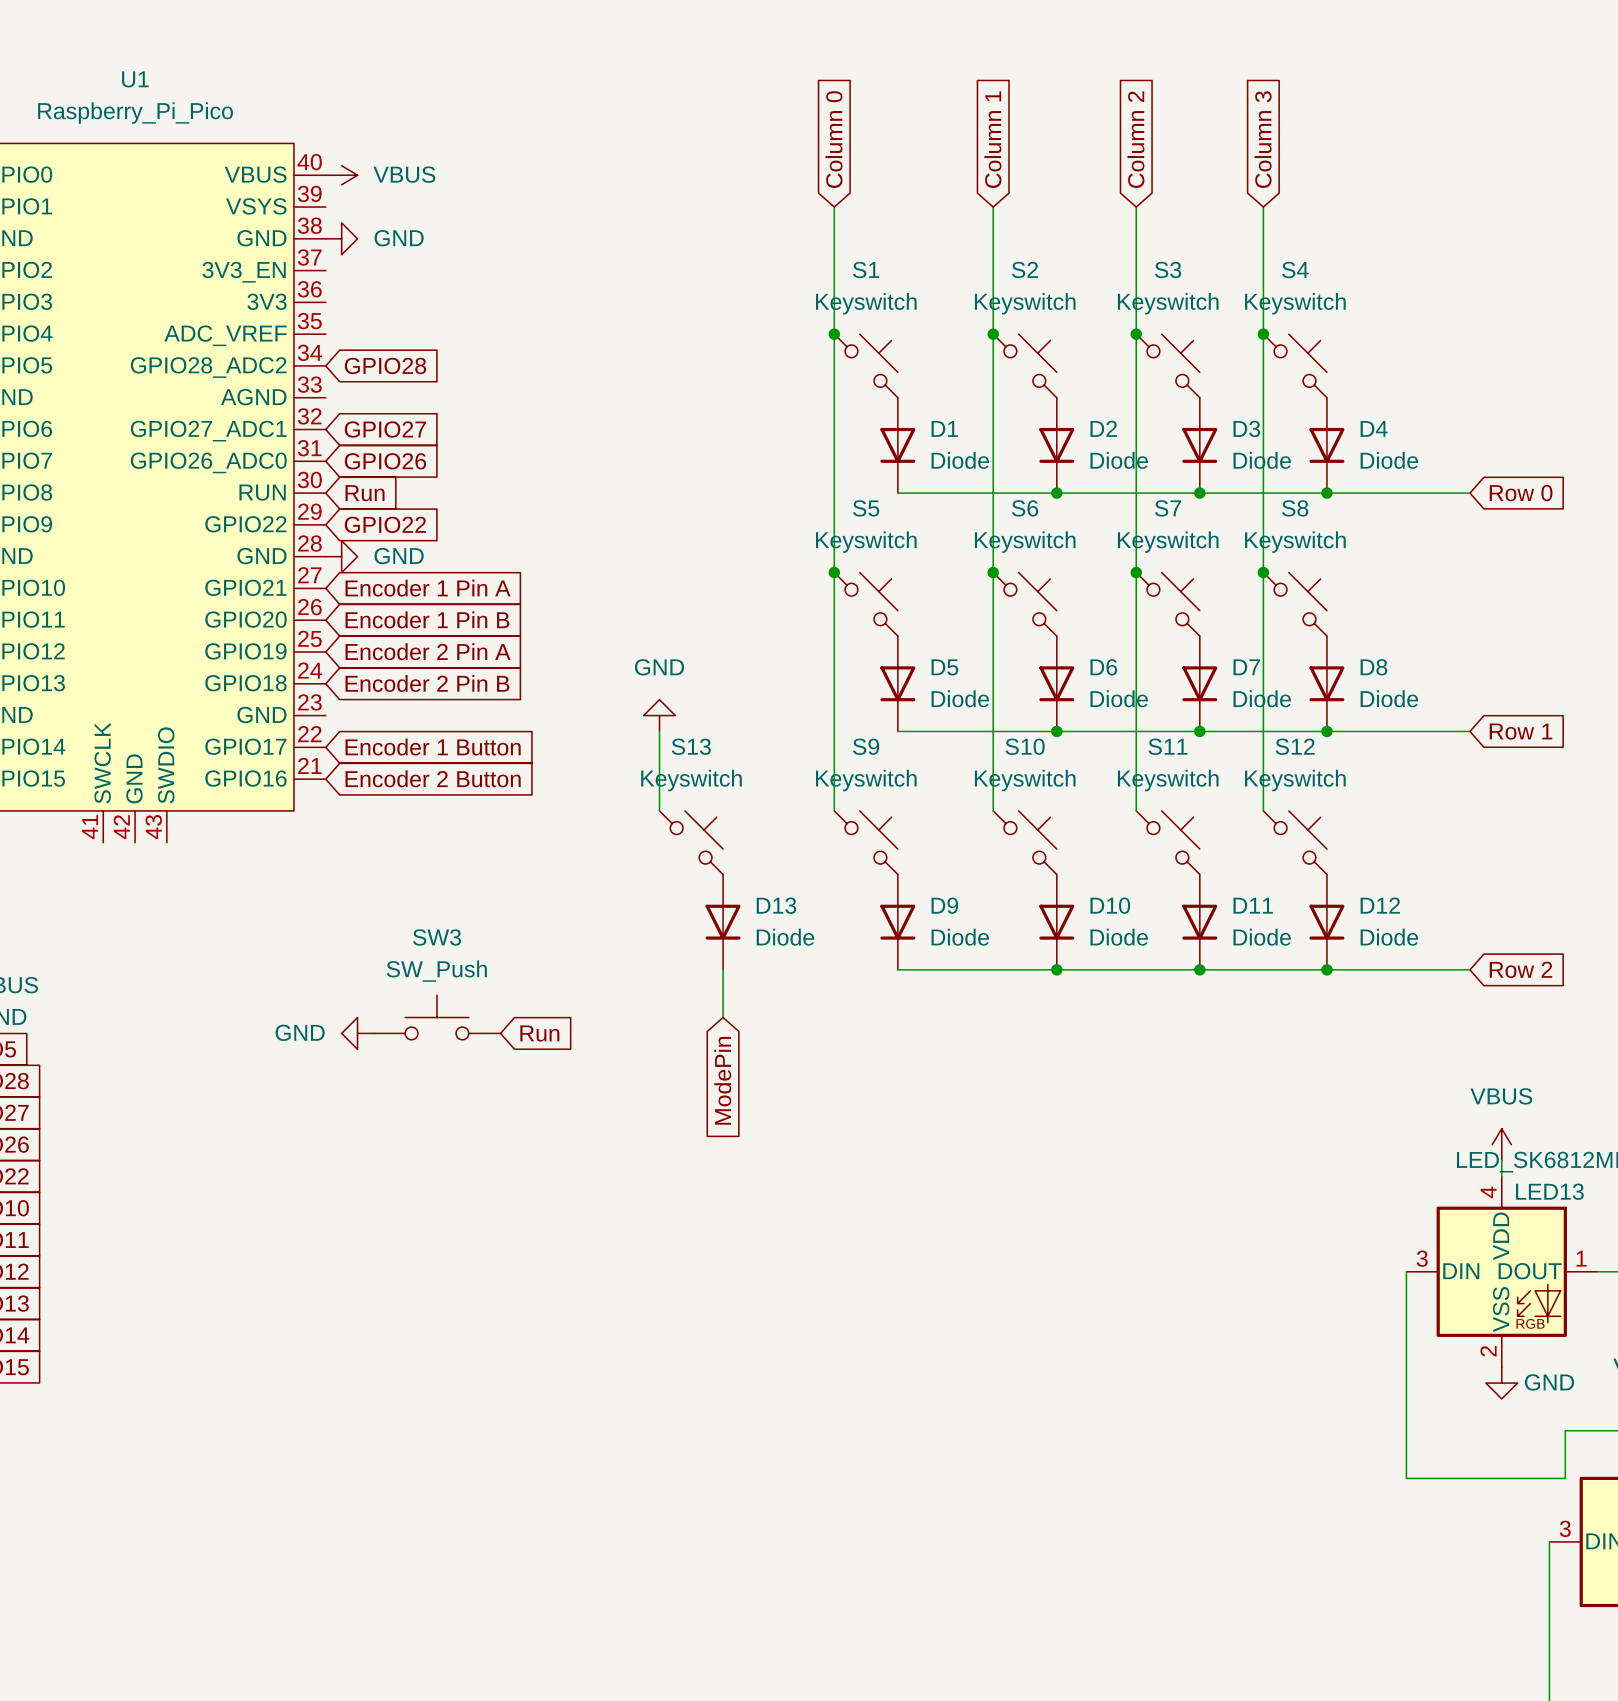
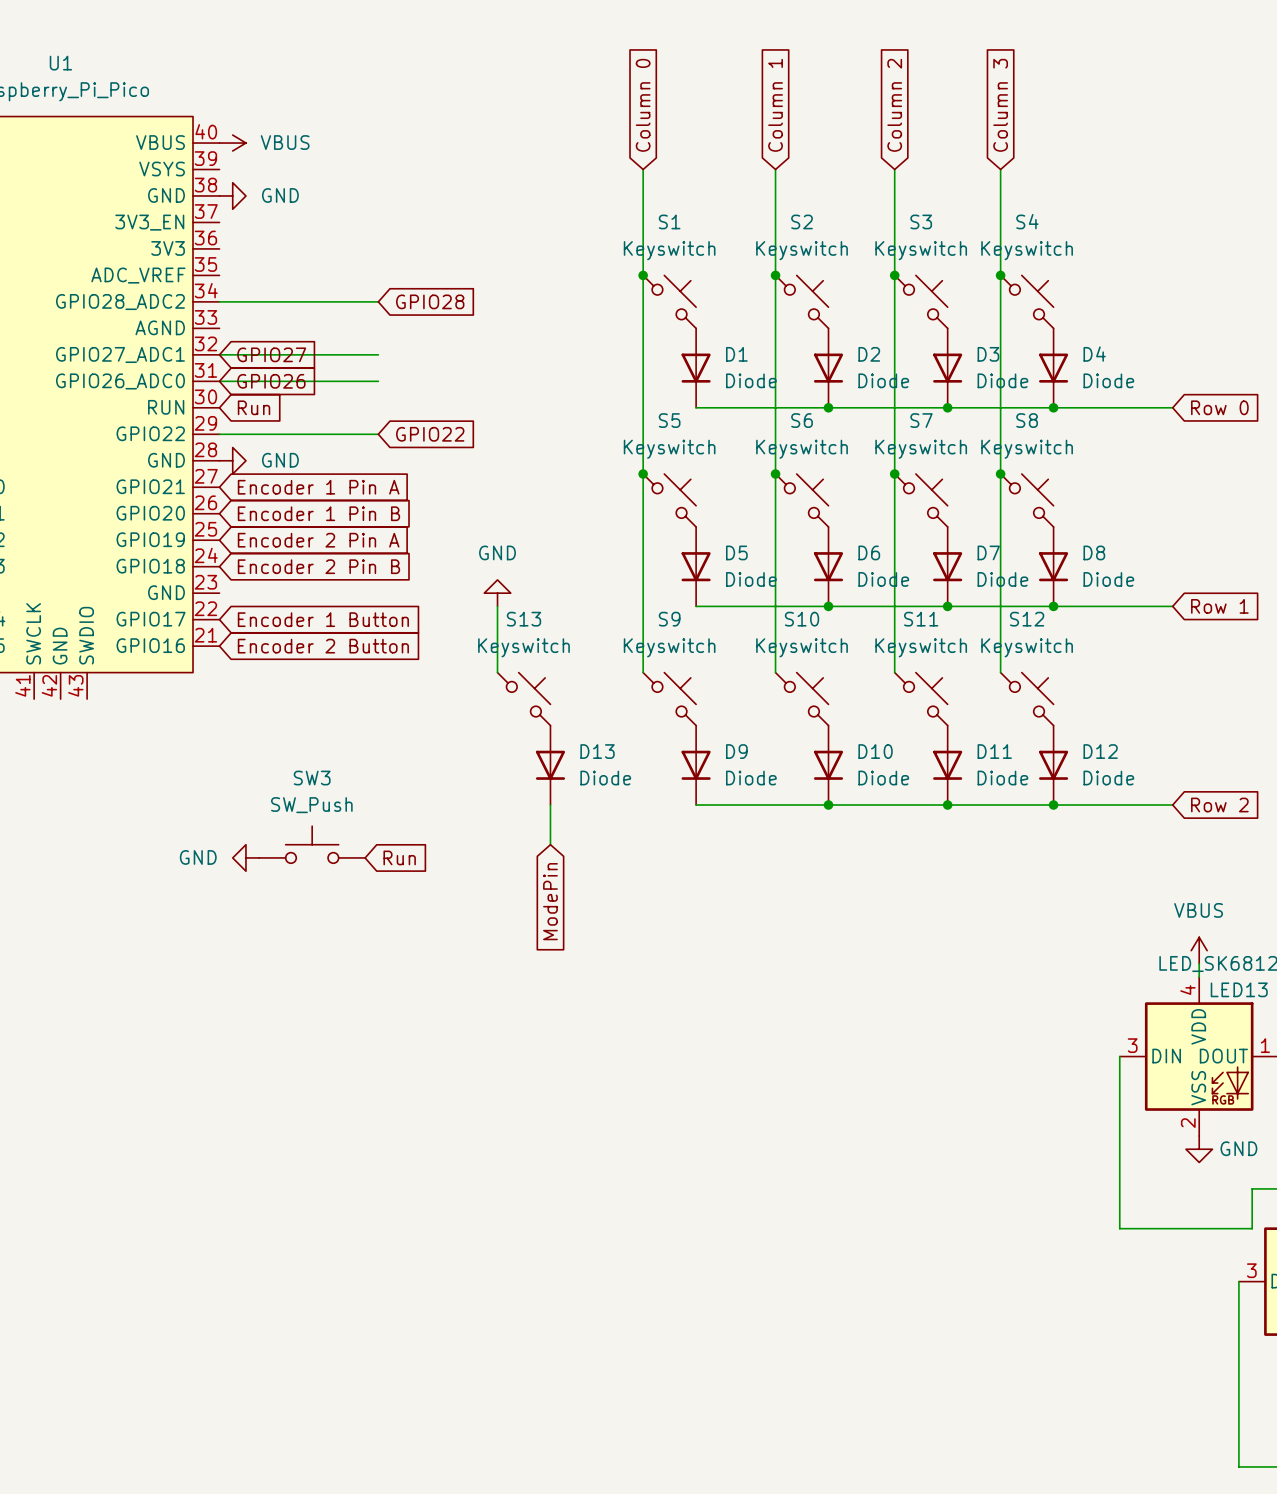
wire: none -> (219, 301) (378, 301)
global label position: GPIO28 (385, 365) -> GPIO28 (430, 301)
wire: none -> (219, 354) (378, 354)
wire: none -> (219, 381) (378, 381)
wire: none -> (219, 434) (378, 434)
global label position: GPIO22 (385, 524) -> GPIO22 (430, 434)

